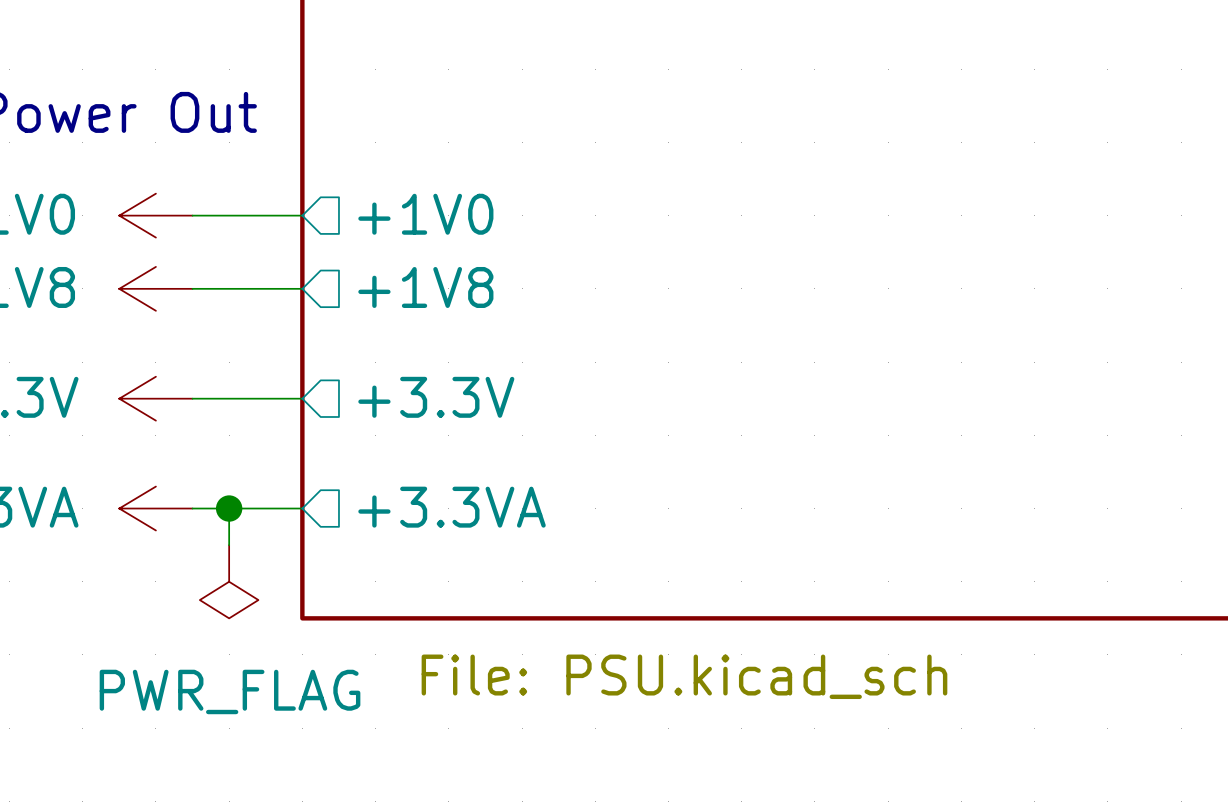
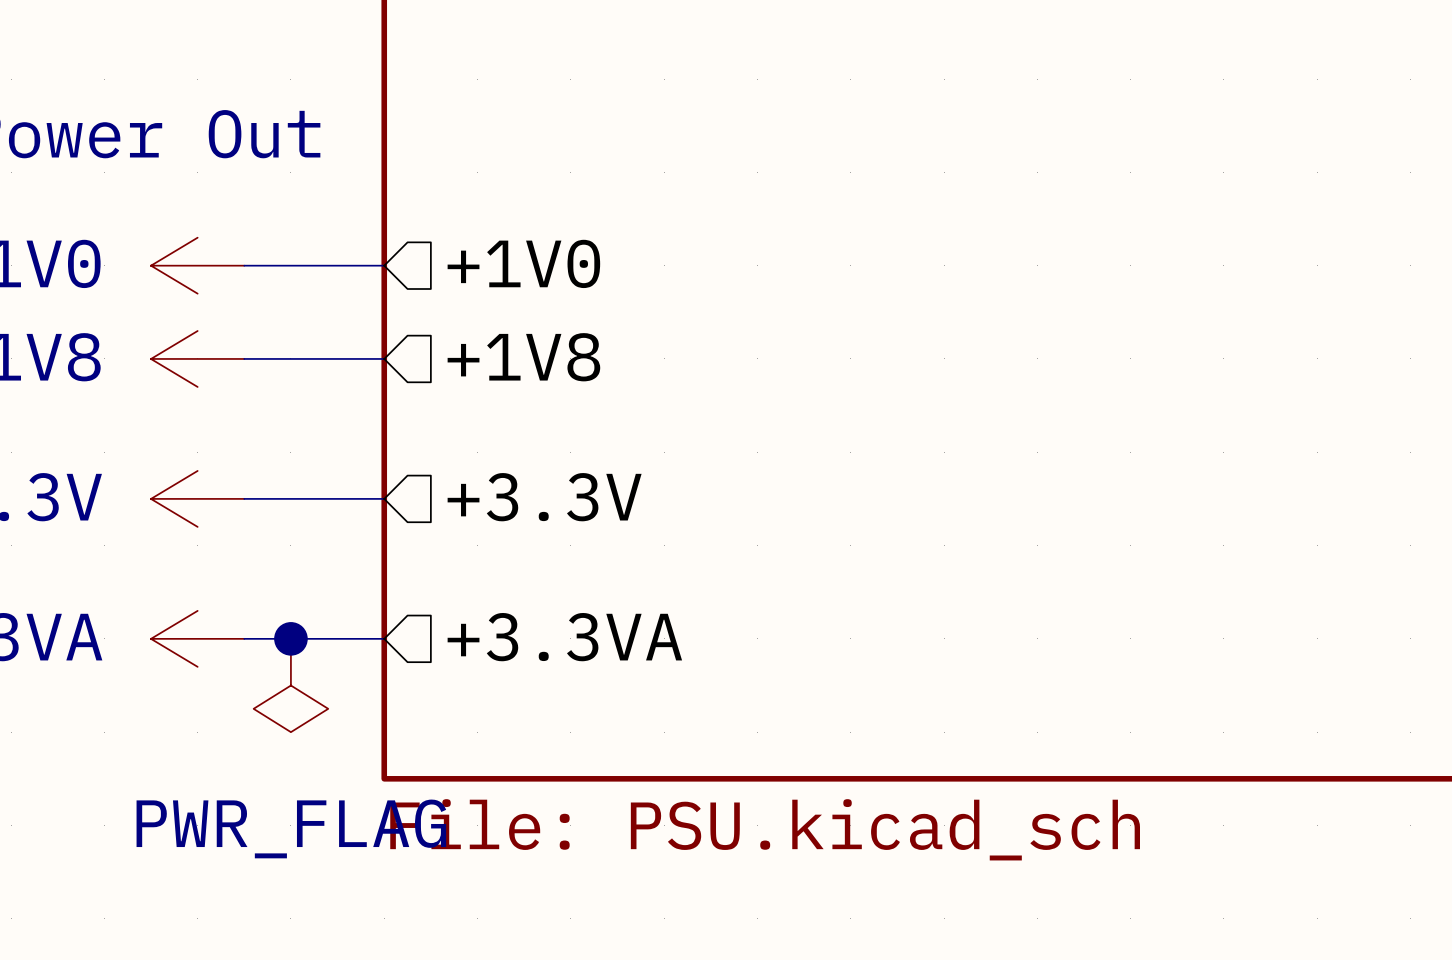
power symbol position: PWR_FLAG (229, 581) -> PWR_FLAG (290, 685)
sheet value position: File: PSU.kicad_sch (684, 676) -> File: PSU.kicad_sch (765, 829)

